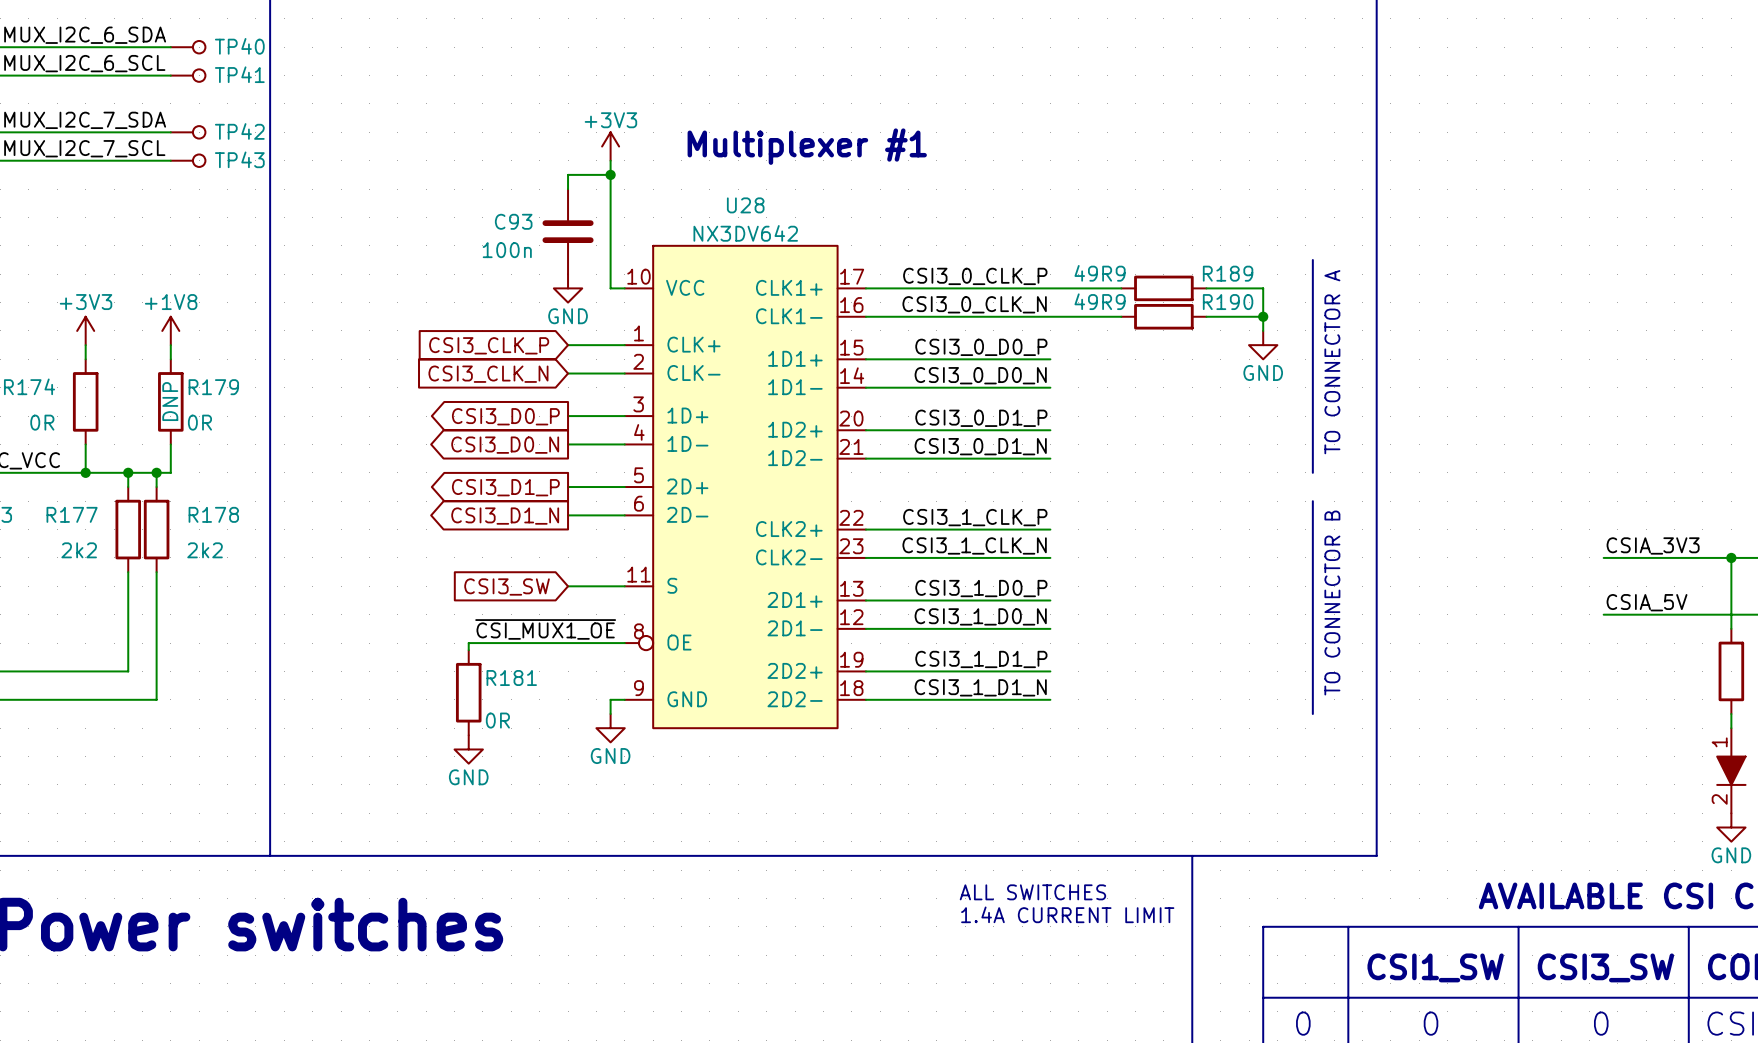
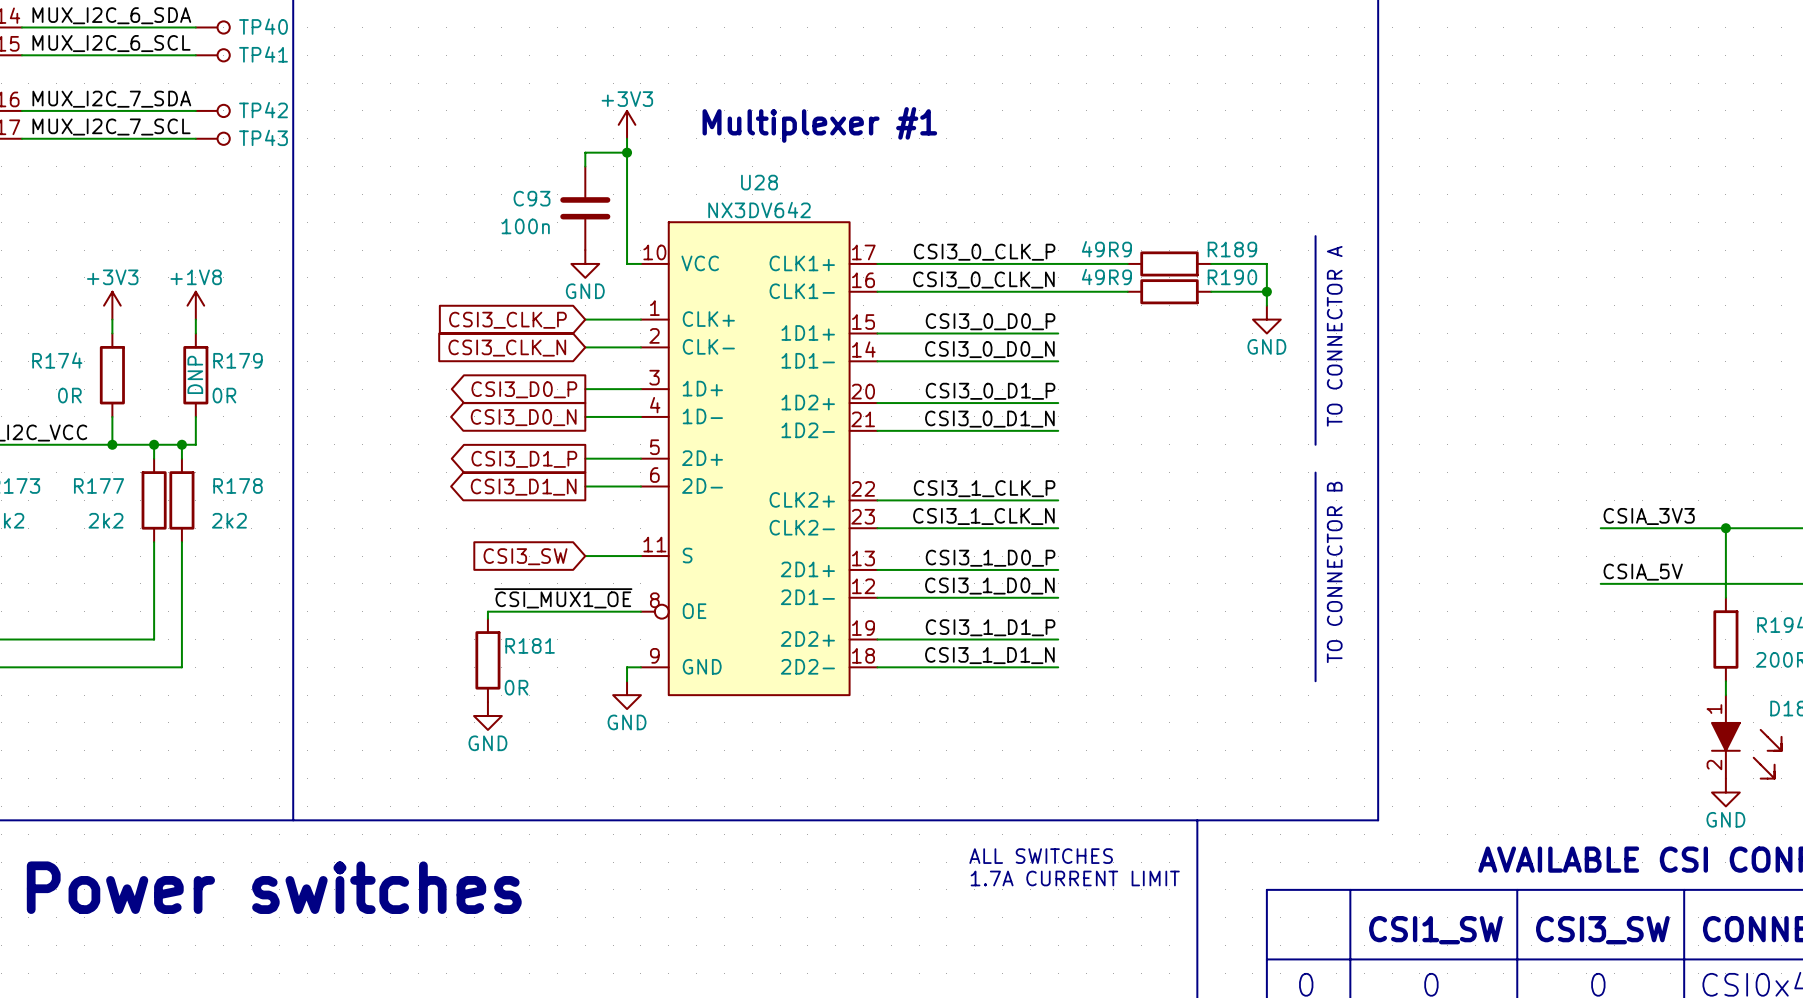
text: 1.4A CURRENT LIMIT (1067, 914) -> 1.7A CURRENT LIMIT (1075, 878)

